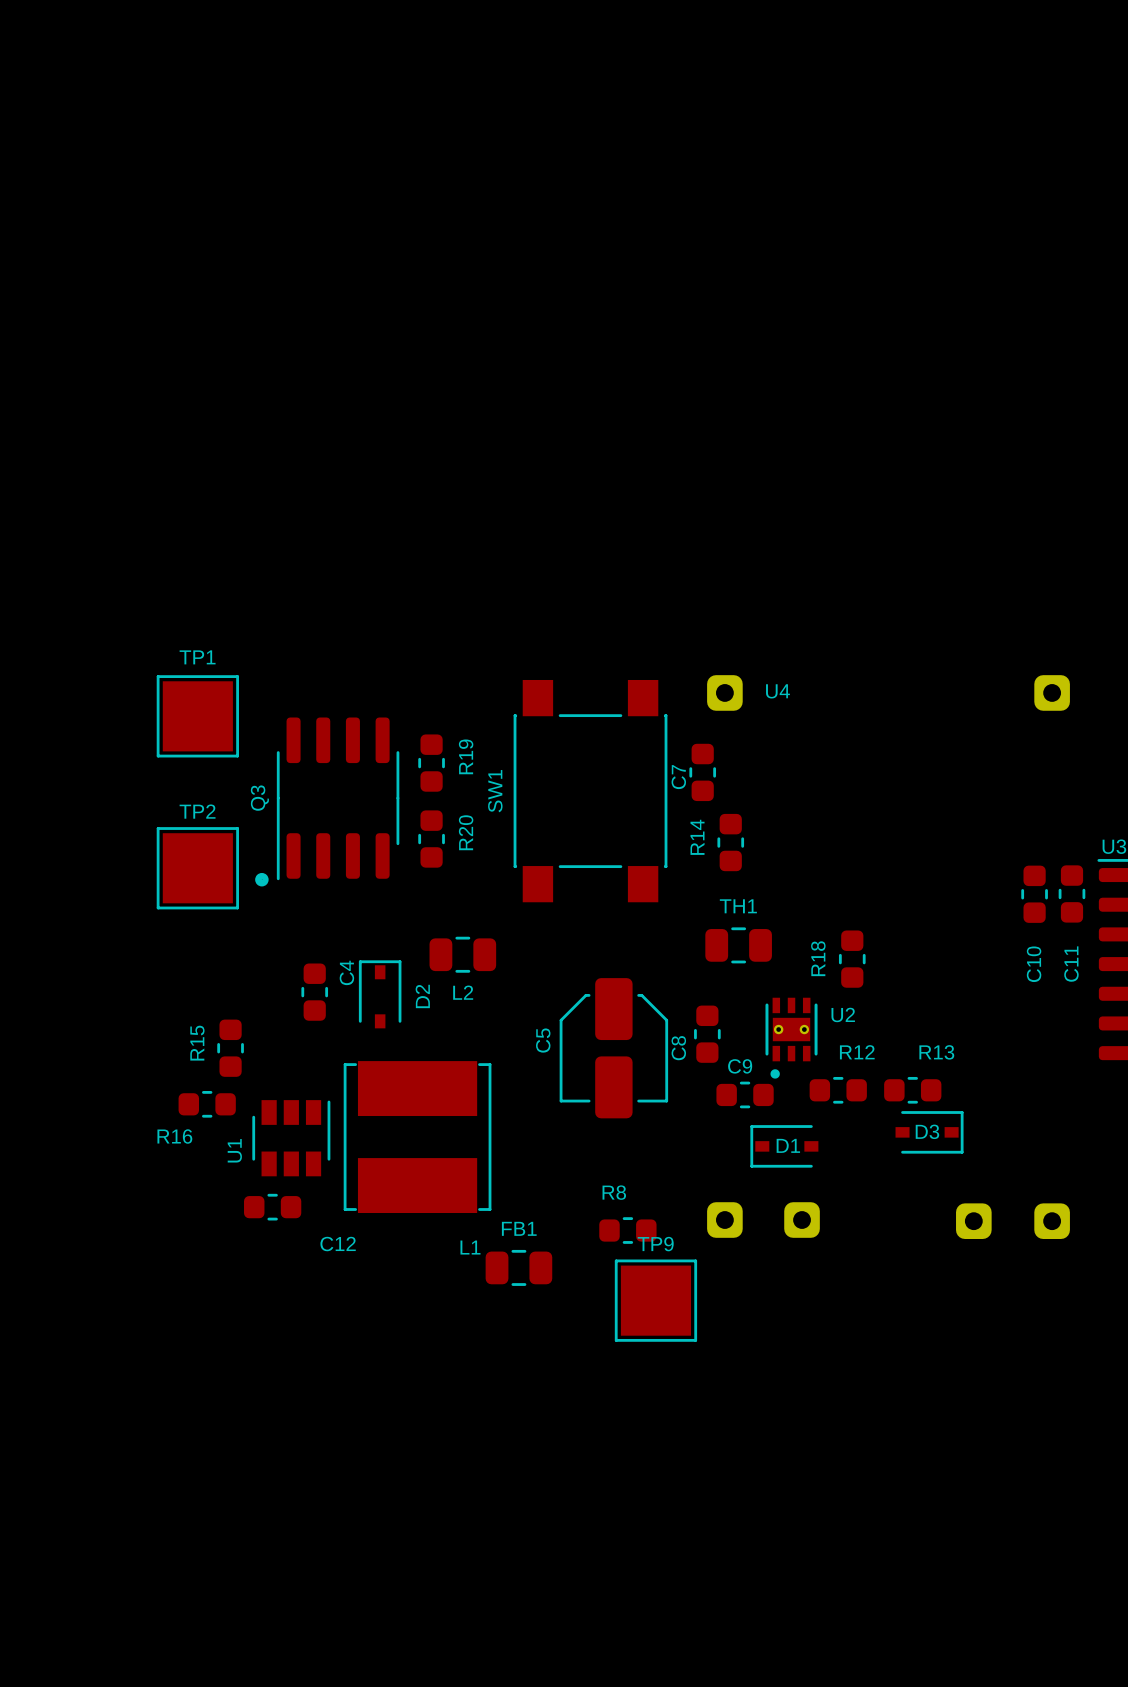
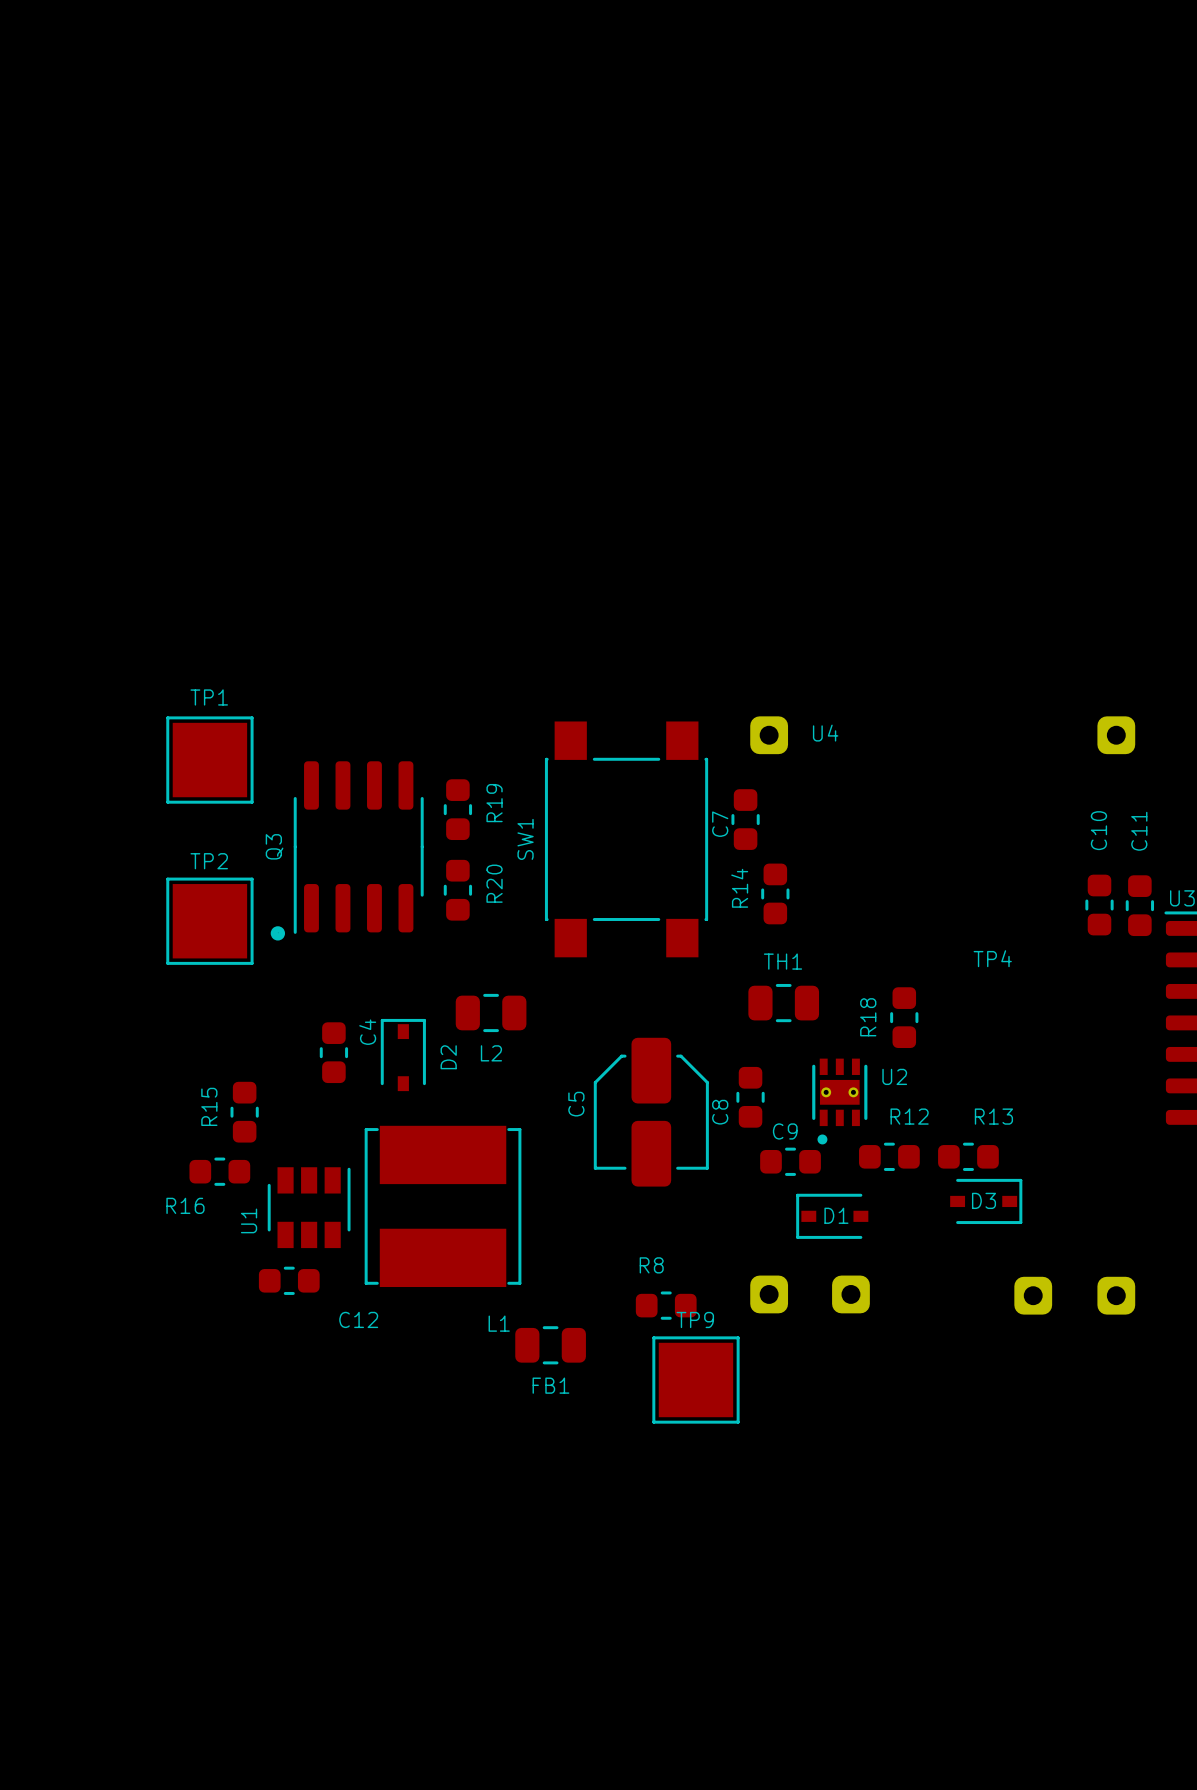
C11 position: (1071, 893) -> (1139, 905)
C10 position: (1034, 894) -> (1099, 905)
TP4: none -> (992, 958)
C10 name position: C10 (1034, 964) -> C10 (1098, 830)
C11 name position: C11 (1071, 964) -> C11 (1139, 831)
FB1 name position: FB1 (519, 1228) -> FB1 (550, 1385)

